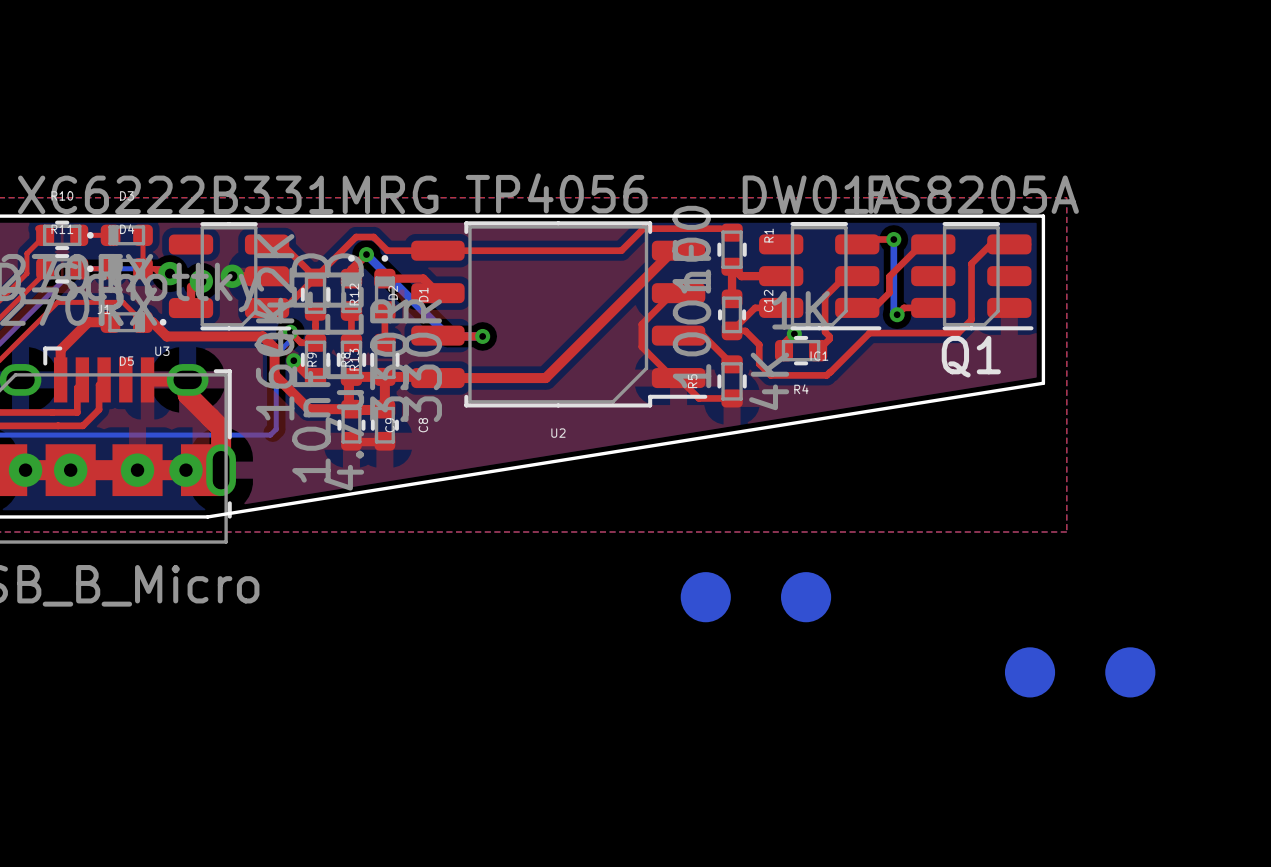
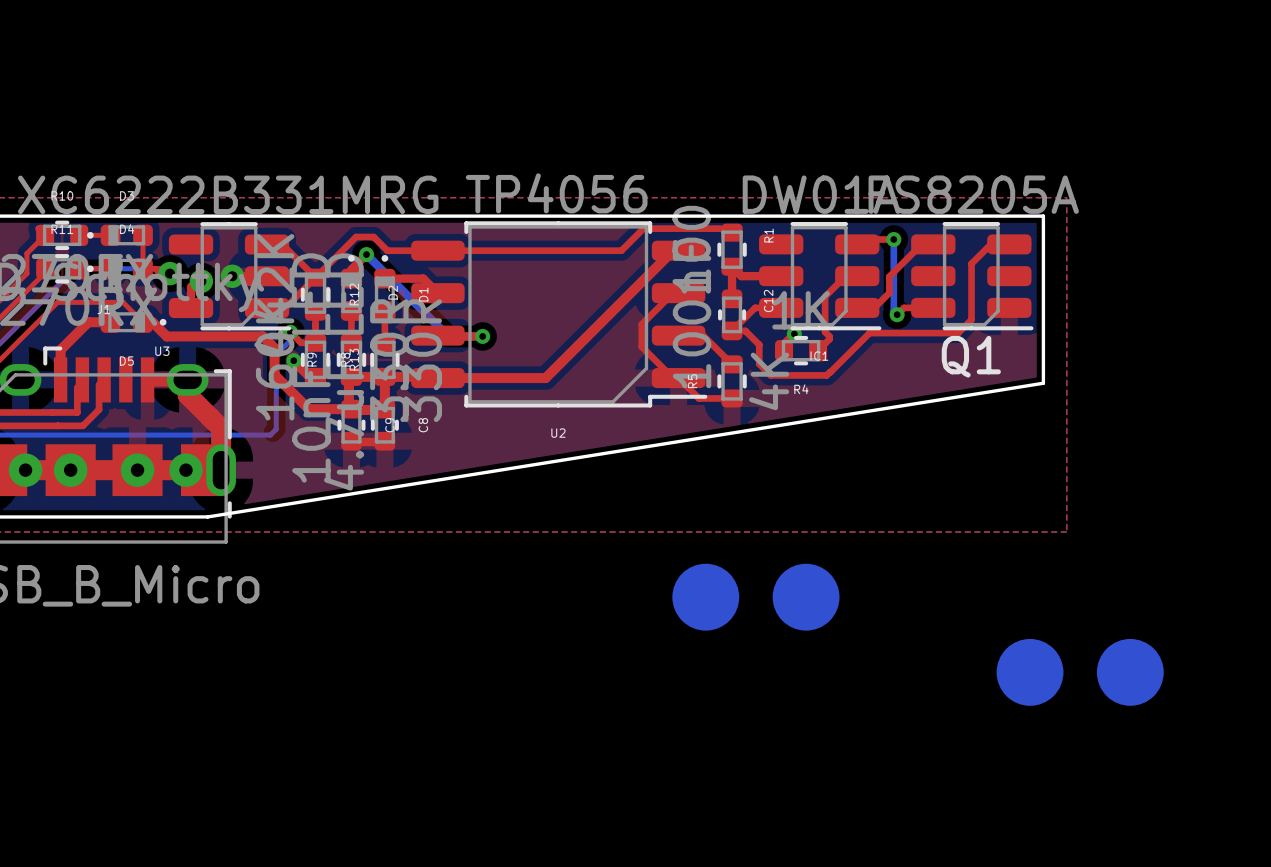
part footprint: [680, 572, 731, 623] -> [672, 563, 740, 631]
part footprint: [781, 572, 832, 623] -> [772, 563, 840, 631]
part footprint: [1004, 647, 1056, 698] -> [996, 638, 1064, 706]
part footprint: [1105, 647, 1156, 698] -> [1096, 638, 1164, 706]

